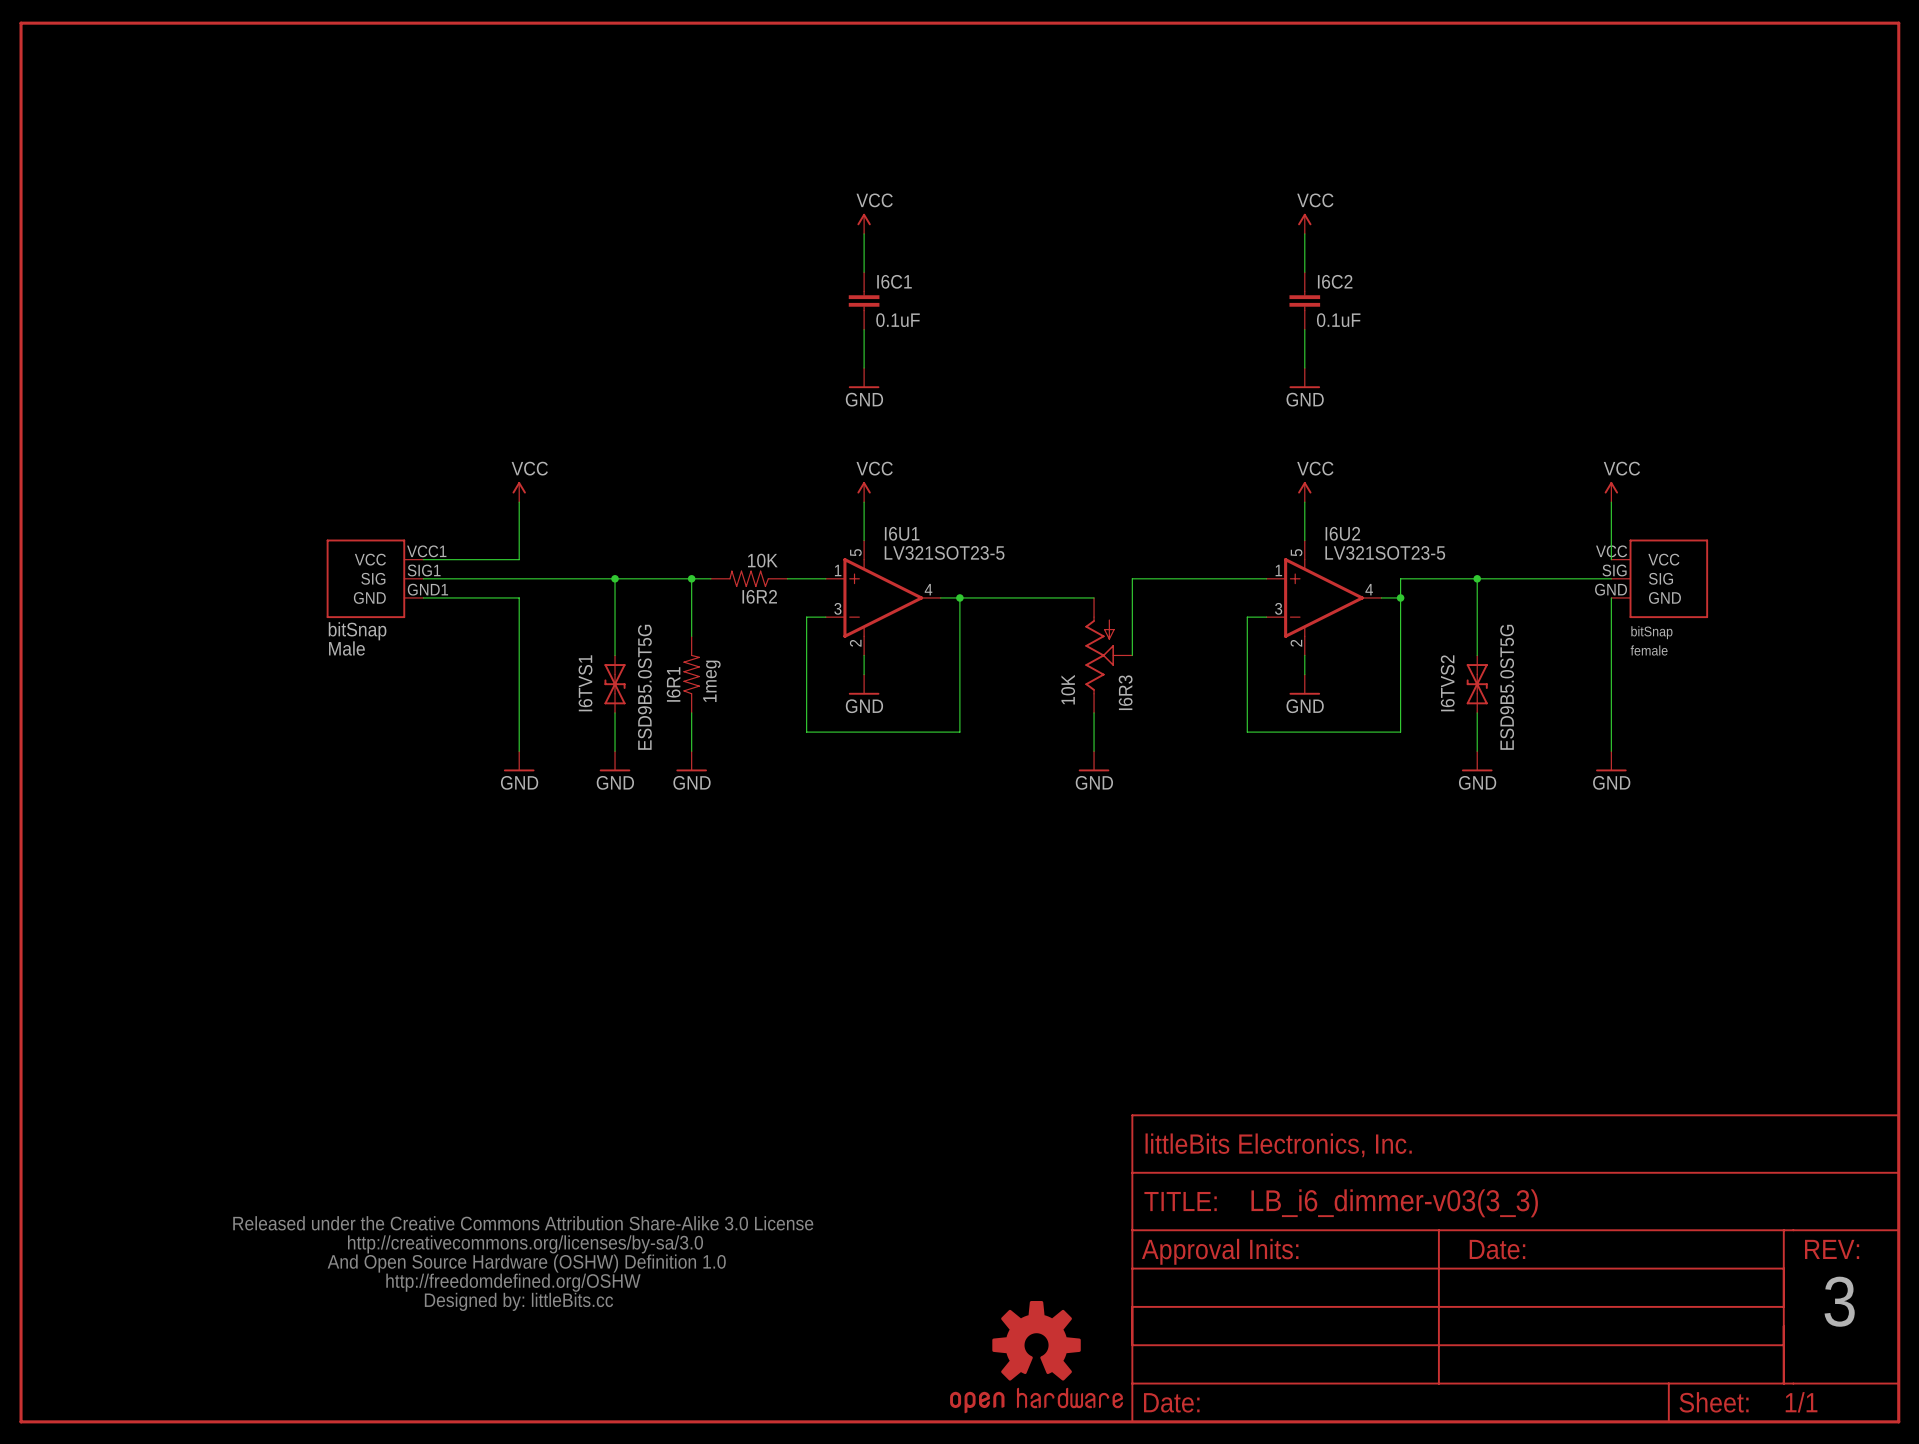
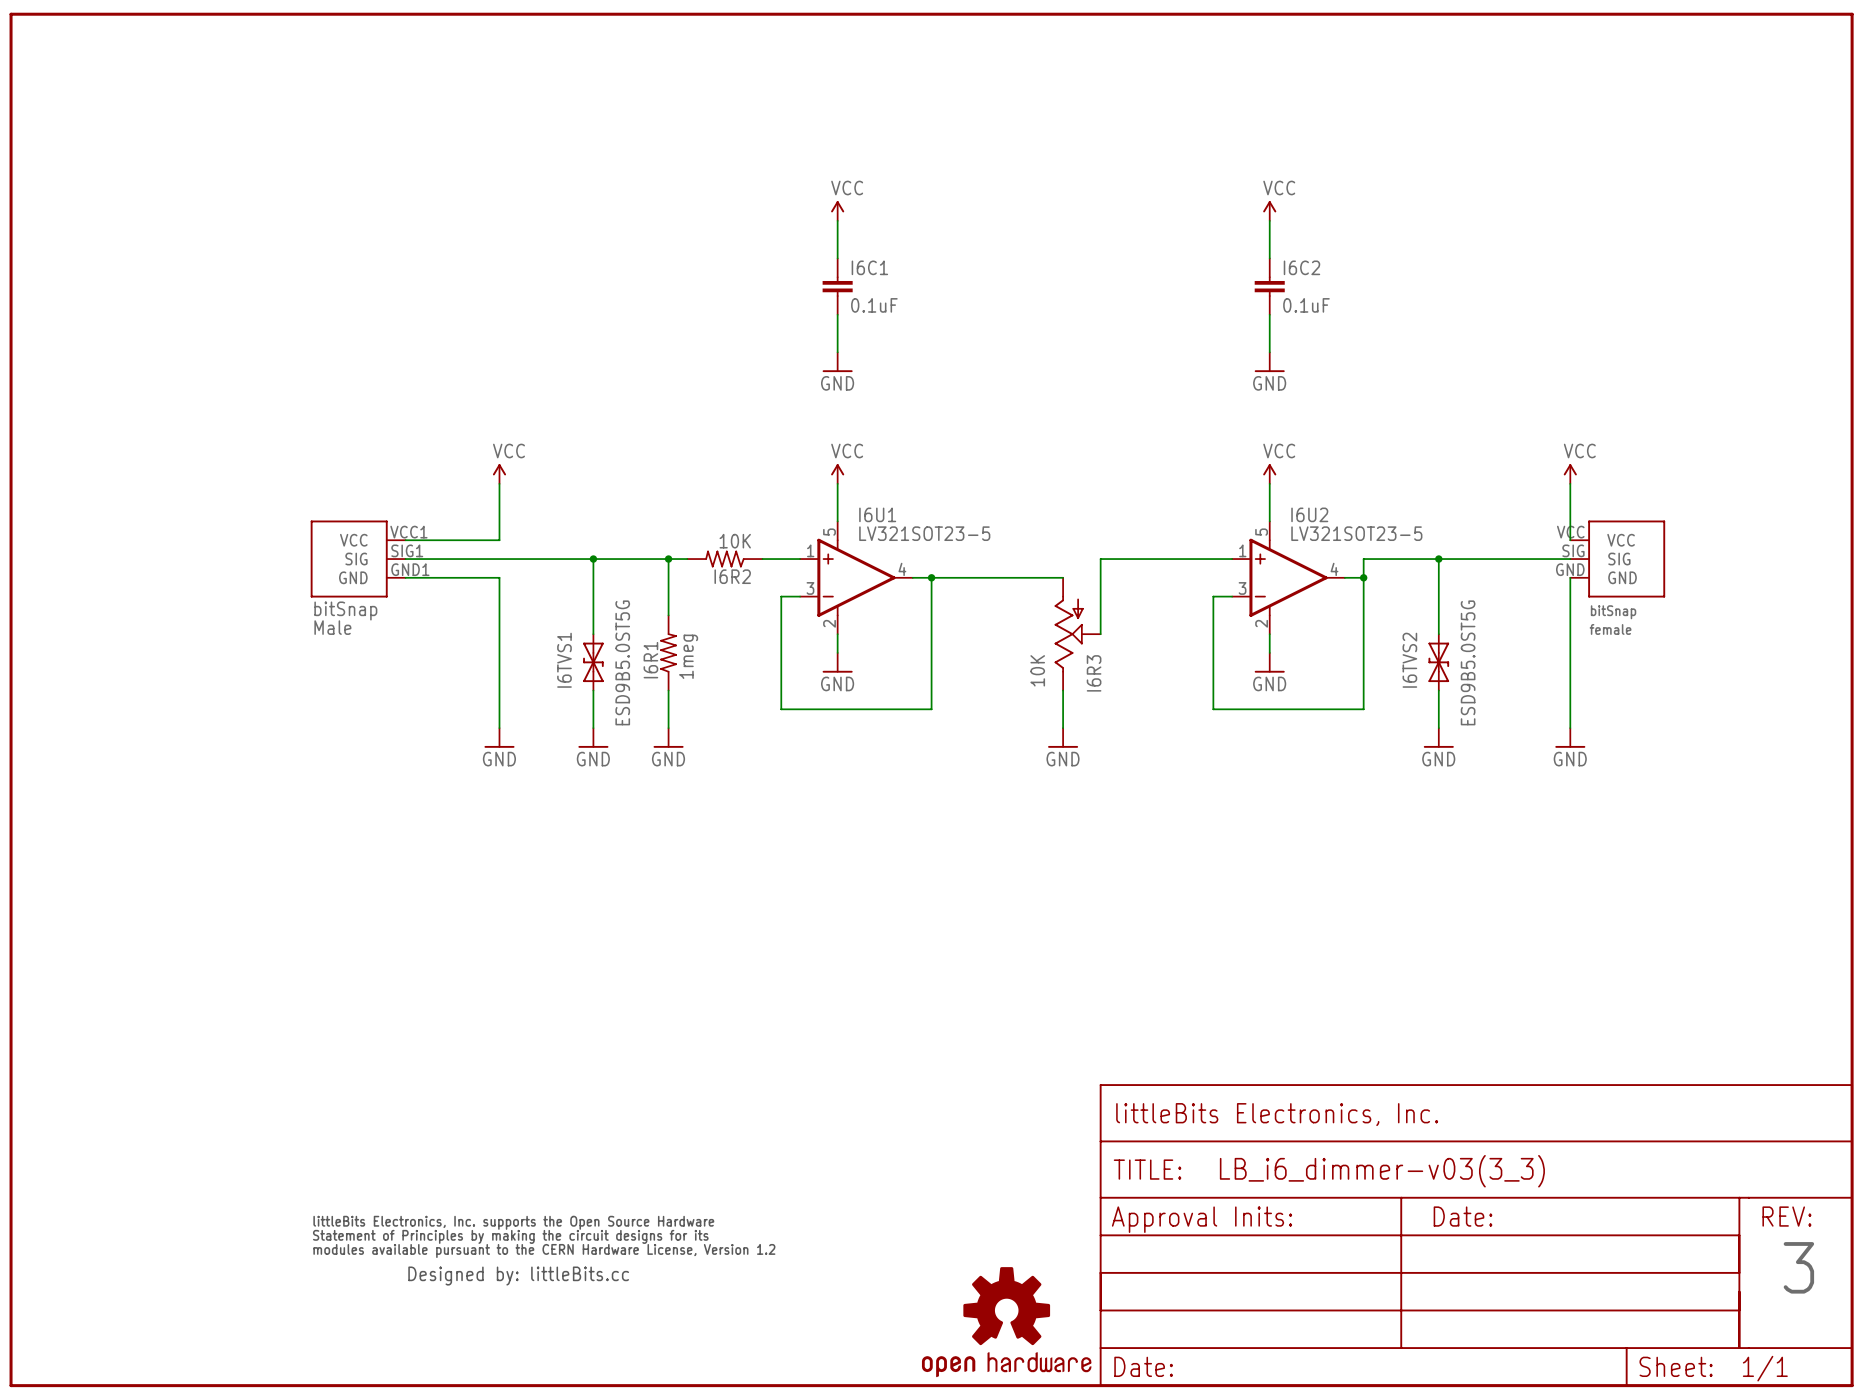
part: (523, 1263) -> none
part: none -> (544, 1250)

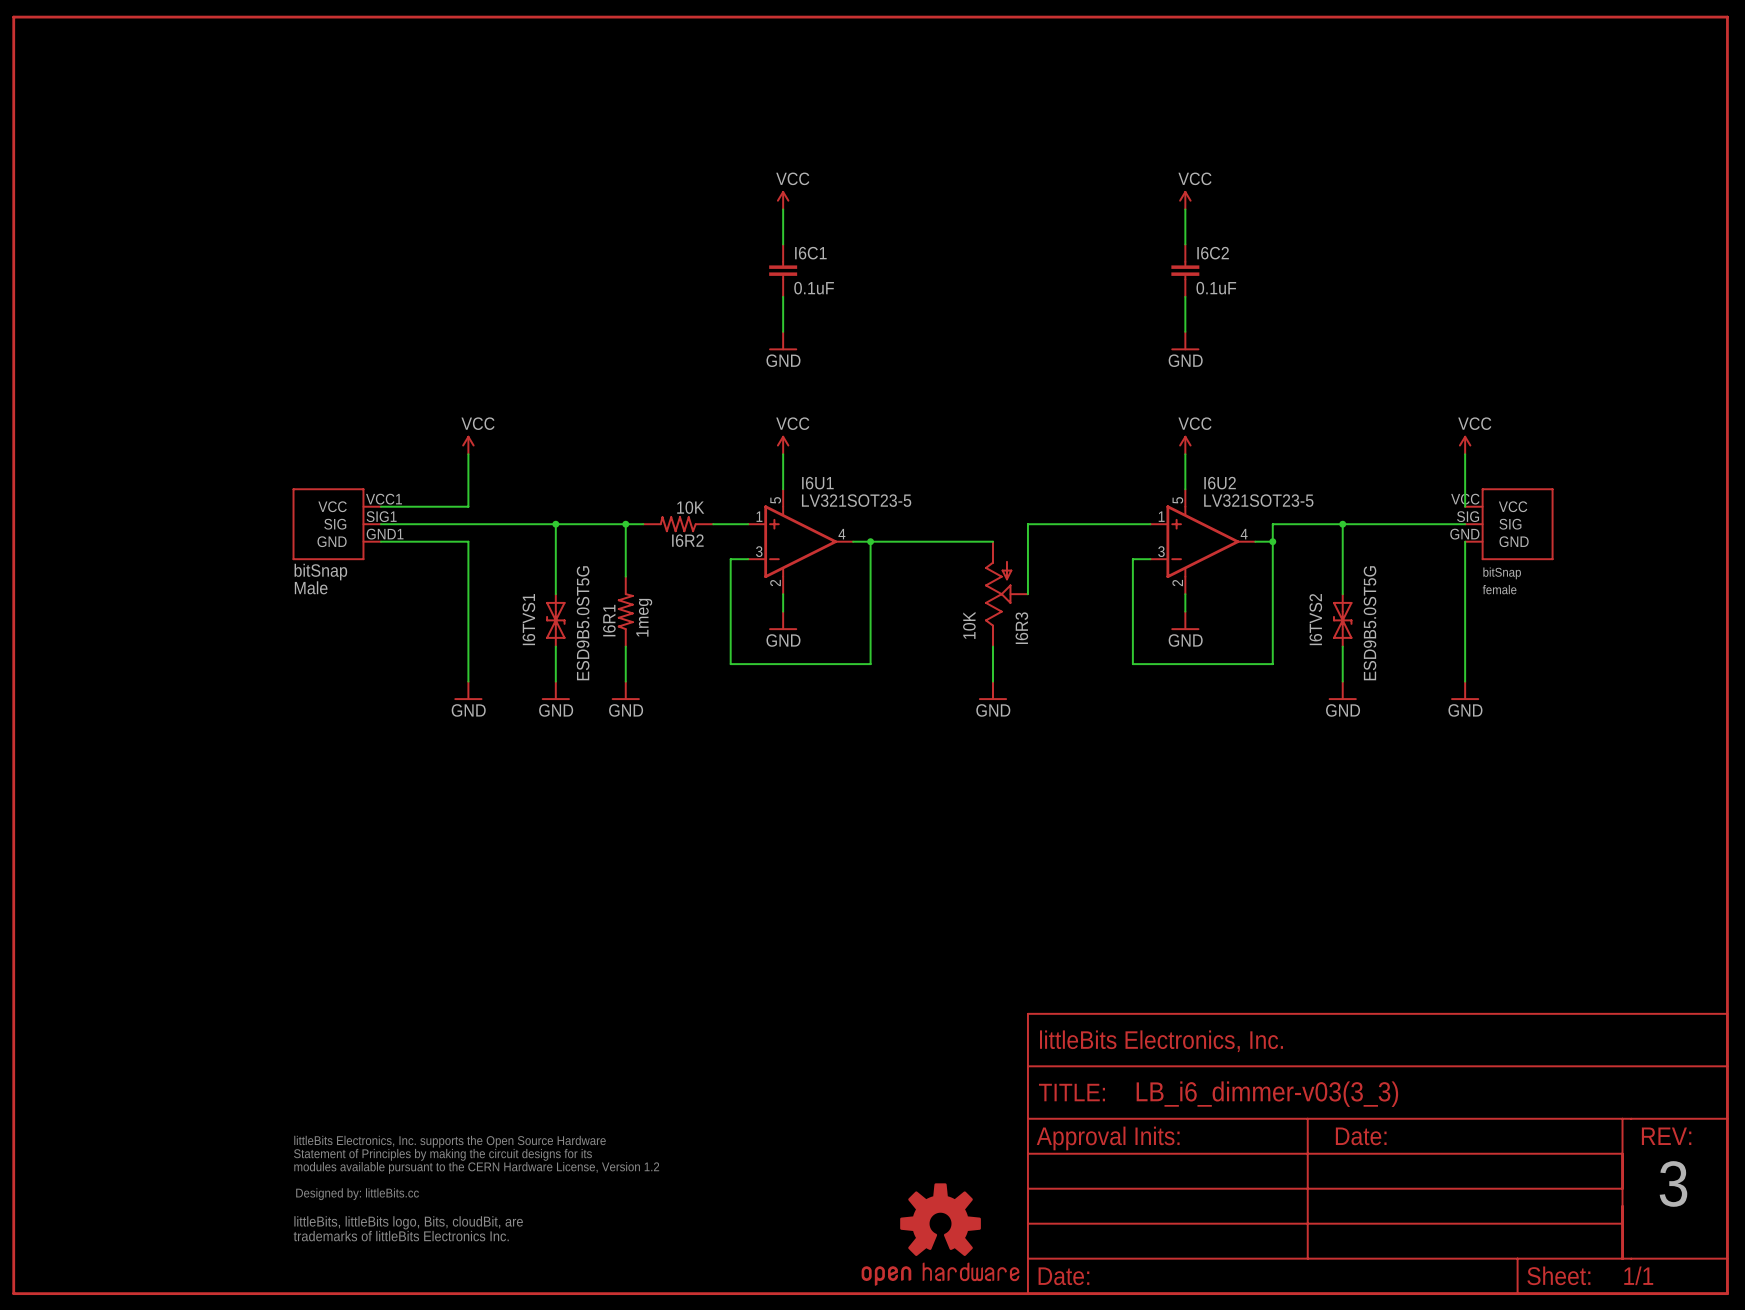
part: (544, 1250) -> none
part: none -> (476, 1188)

